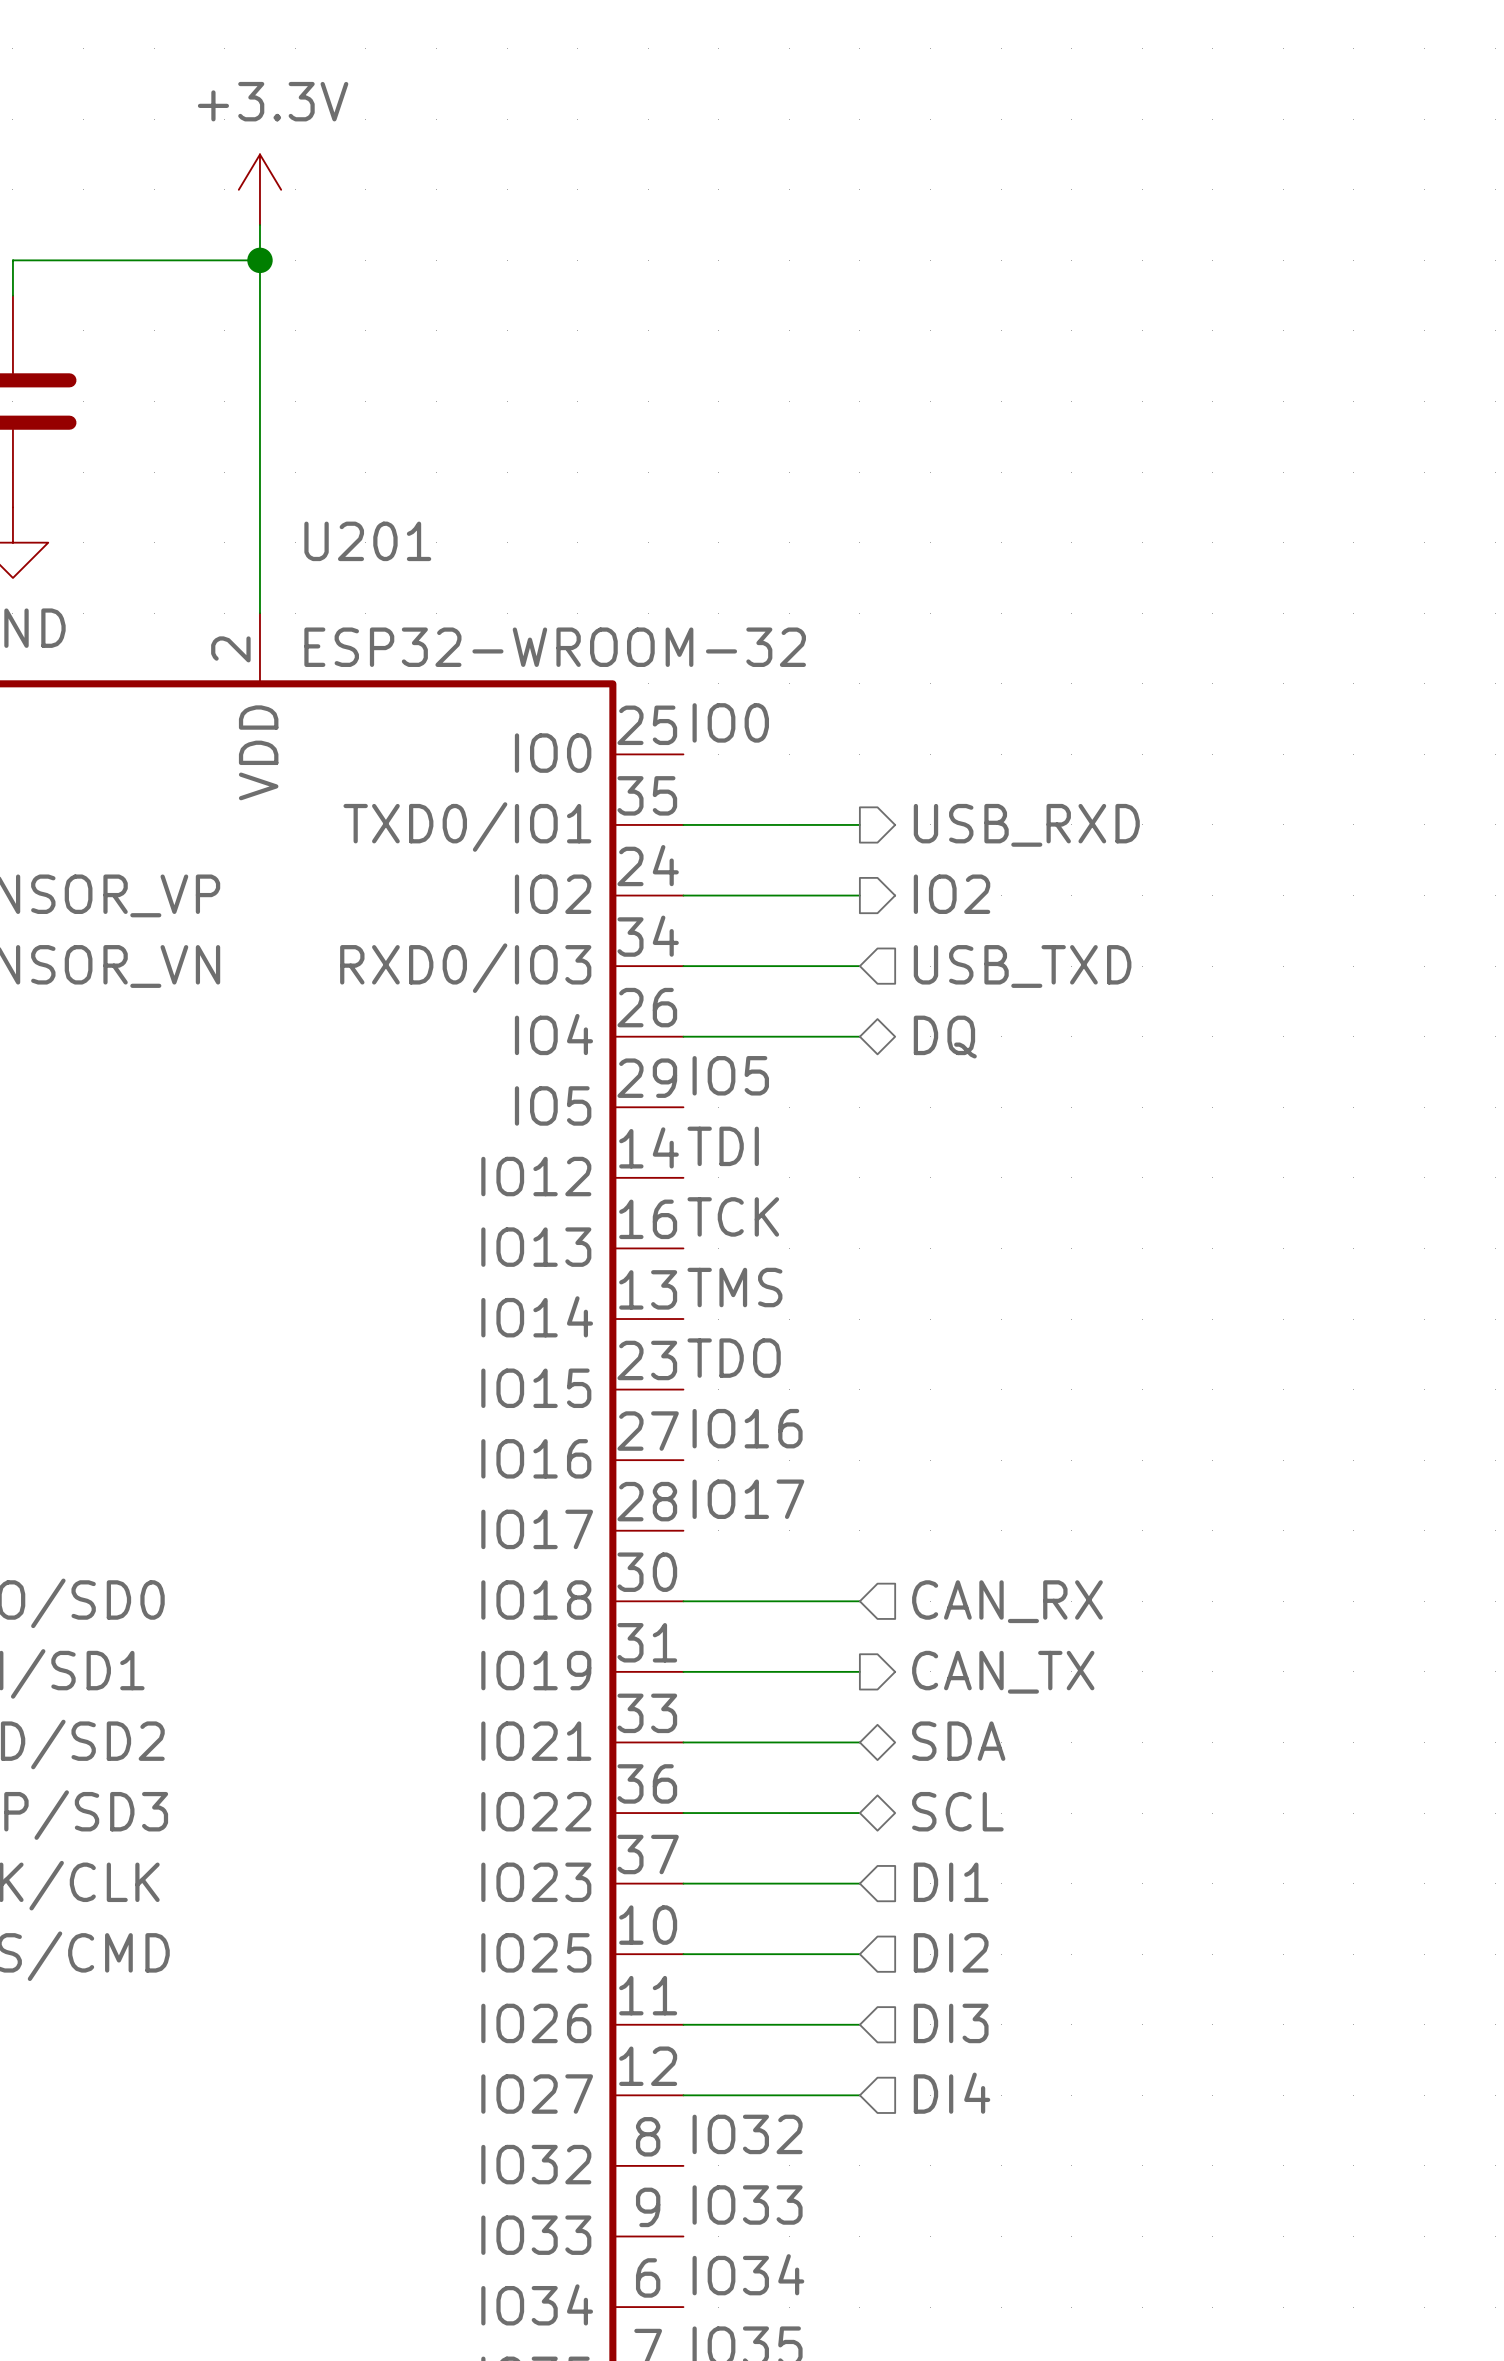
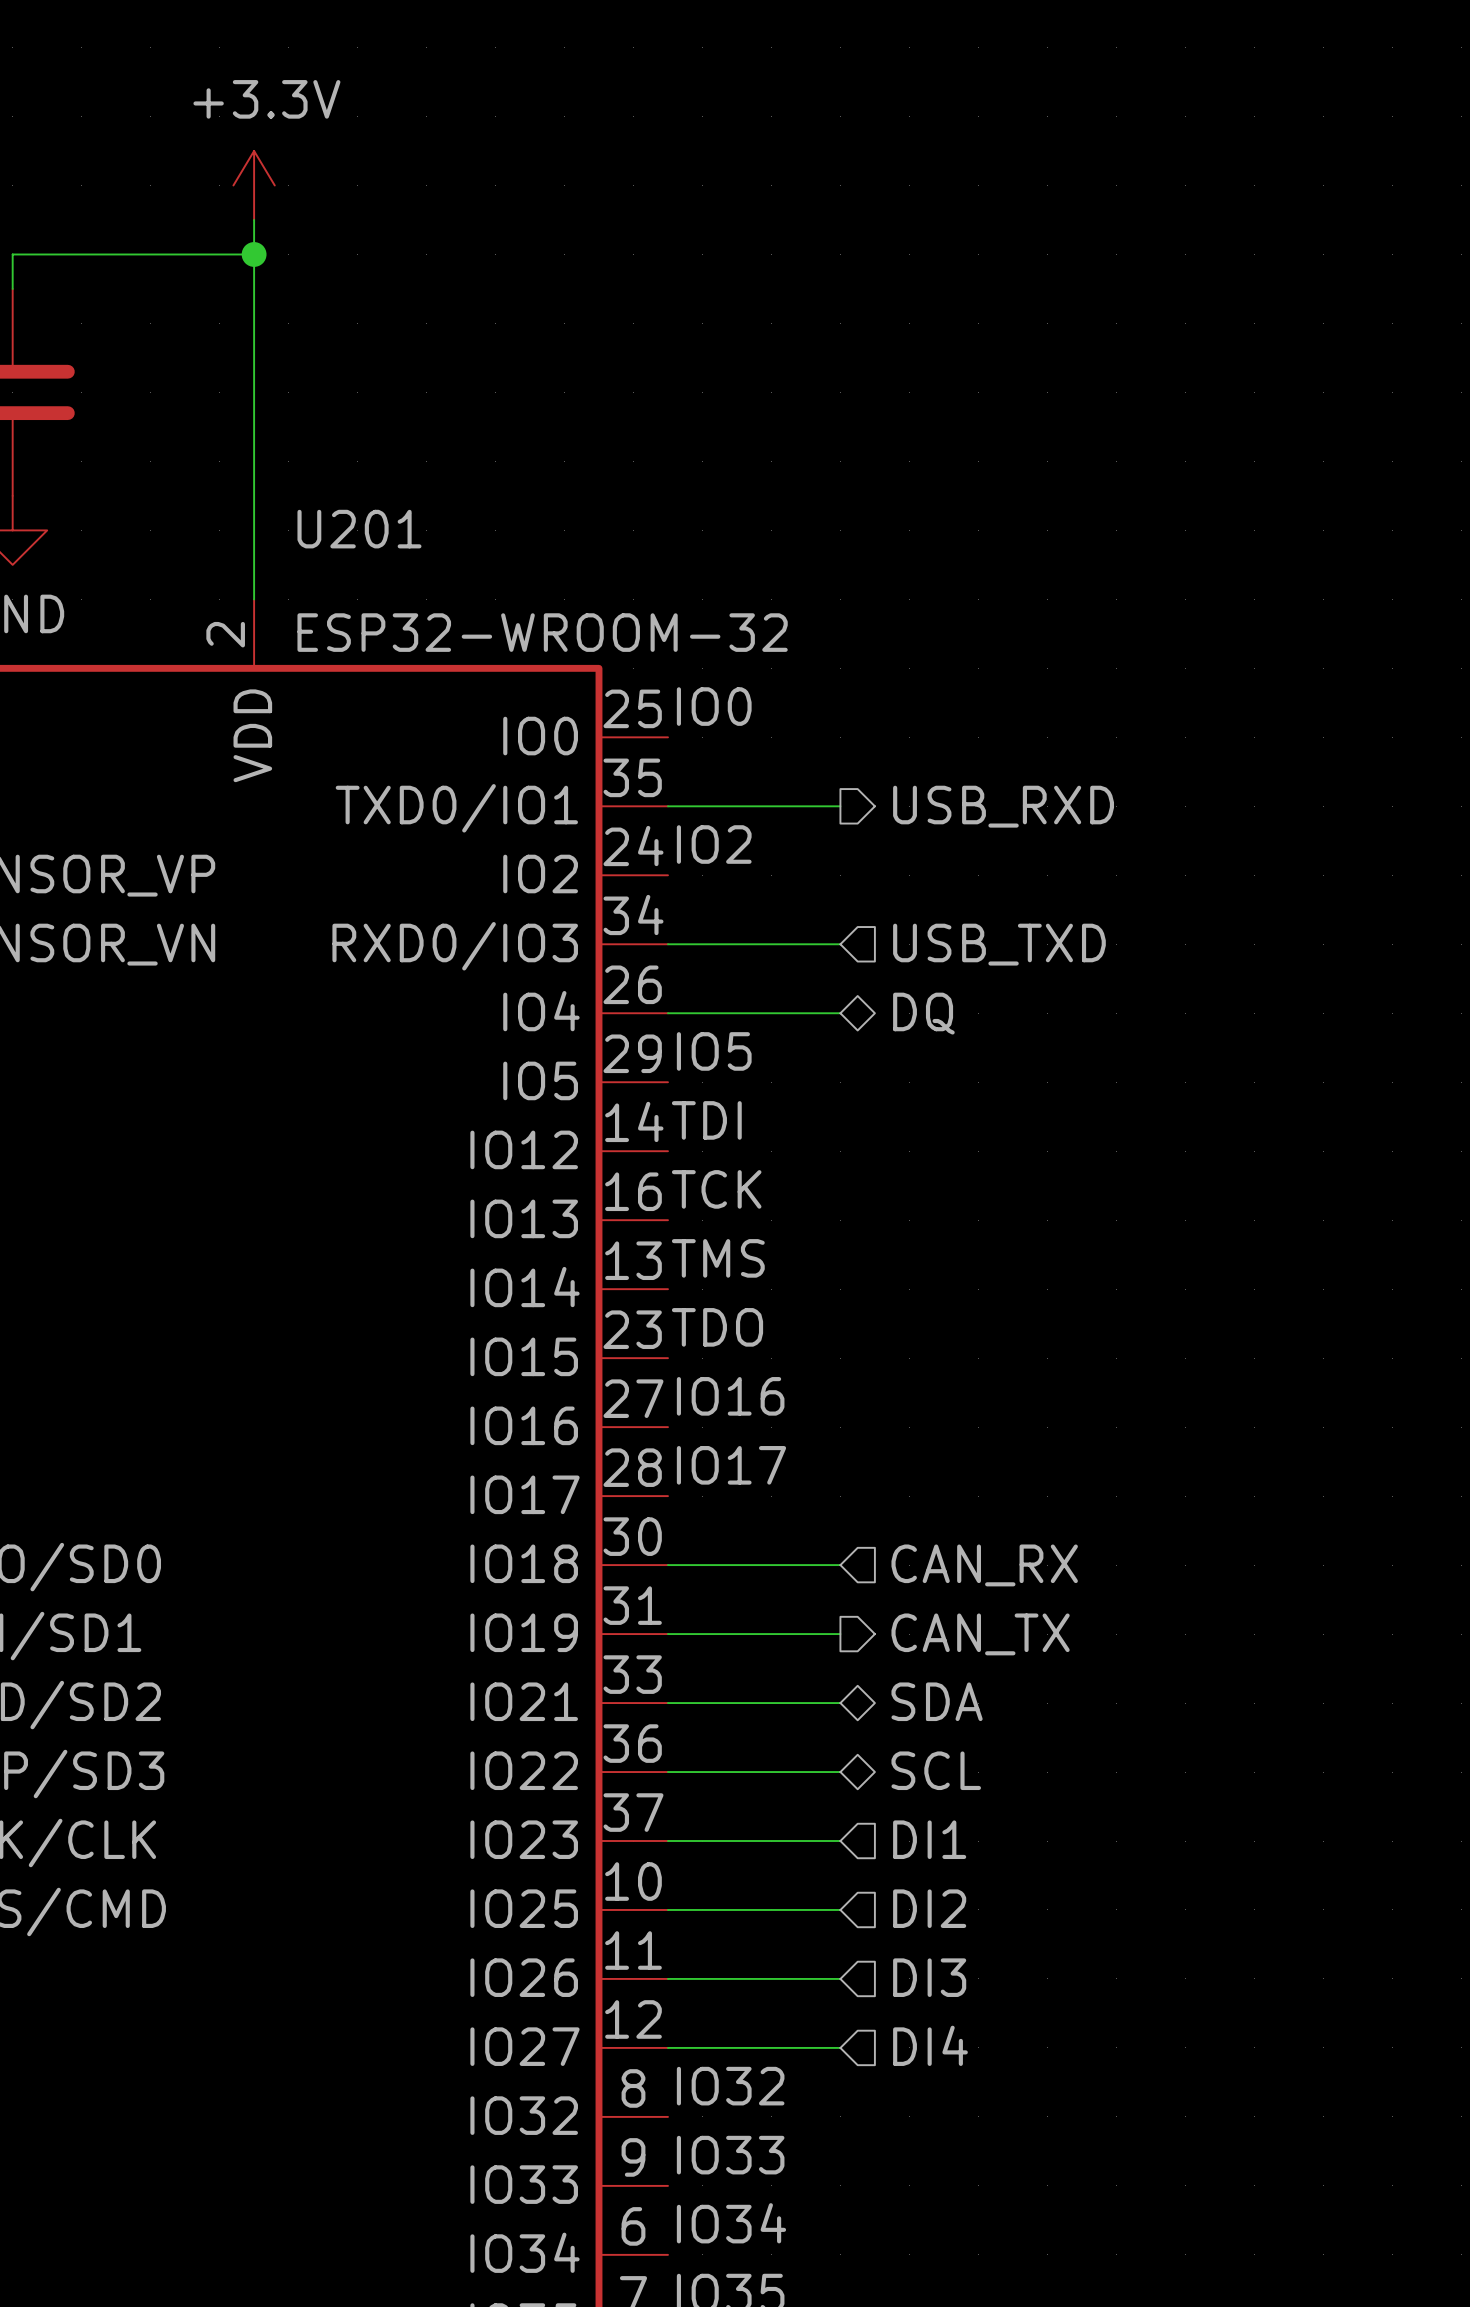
label: none -> IO2 (714, 844)
hierarchical label: IO2 (952, 894) -> none
wire: (683, 895) (859, 895) -> none

